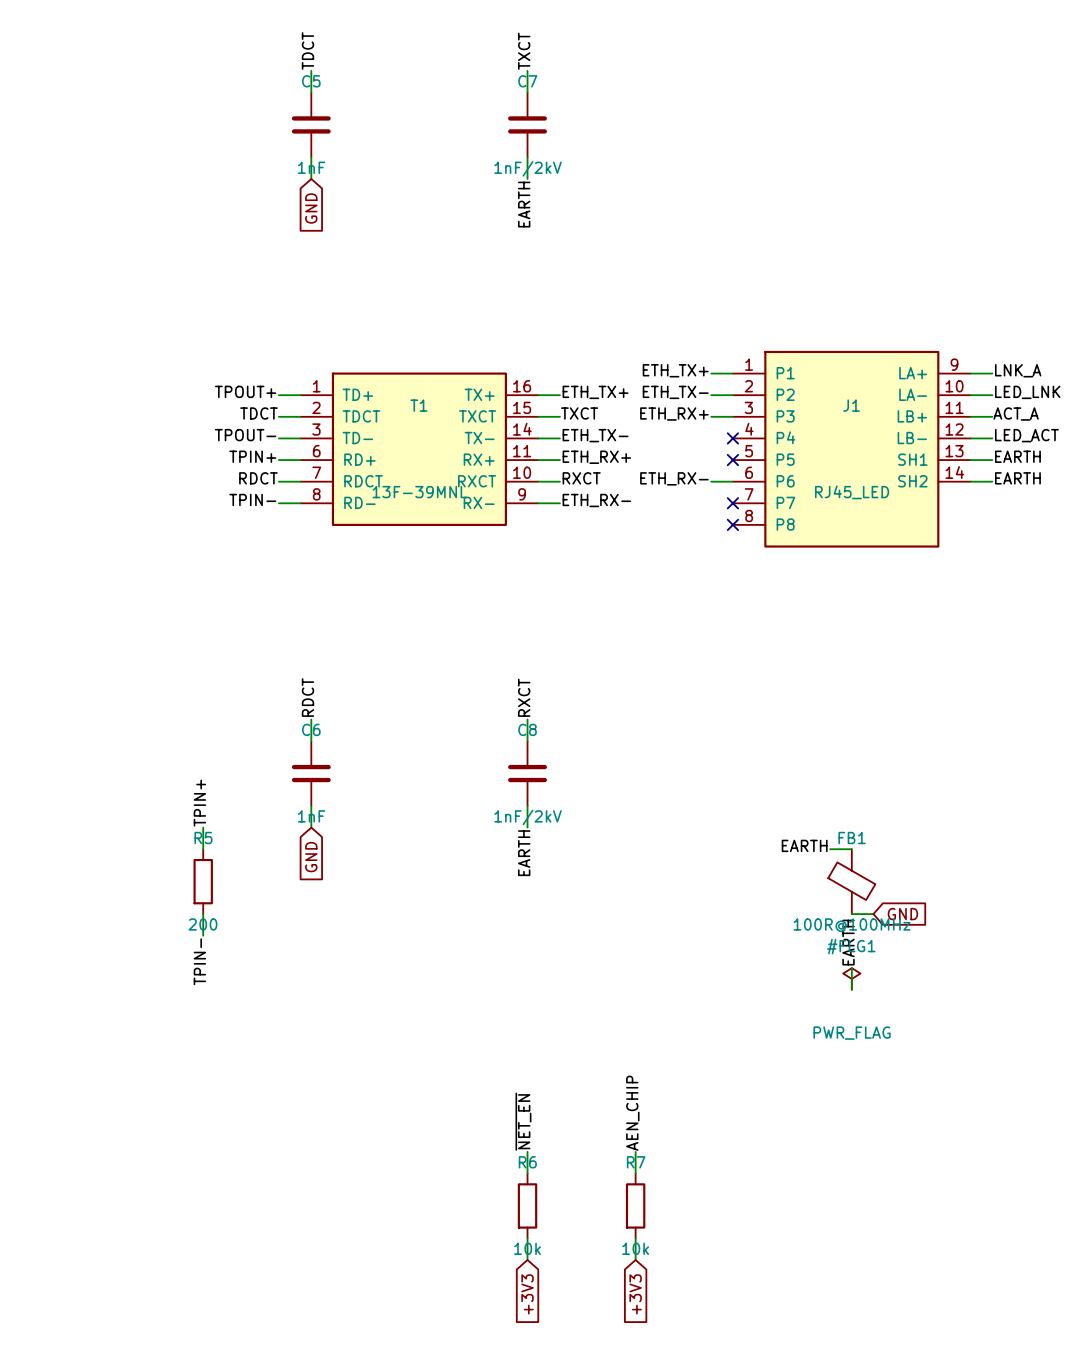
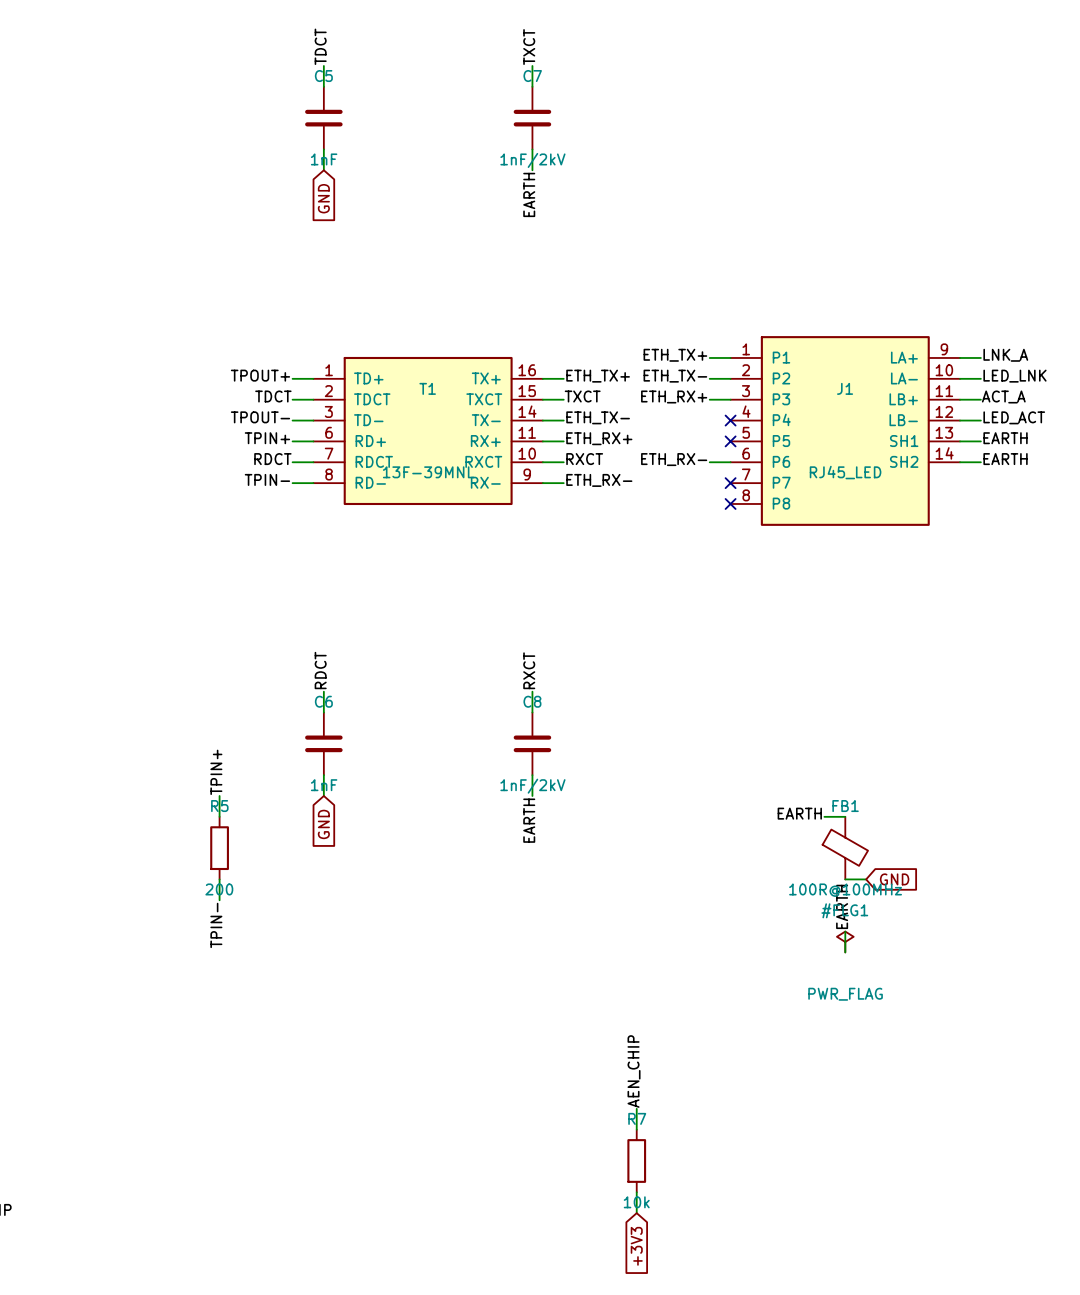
label: ~{NET_EN} (523, 1121) -> none
wire: (527, 1151) (527, 1173) -> none
R6: 10k (527, 1205) -> none
wire: (527, 1238) (527, 1260) -> none
global label: +3V3 (527, 1294) -> none

